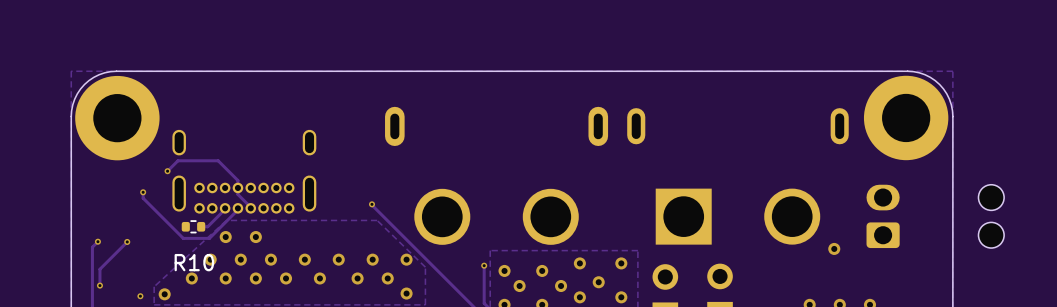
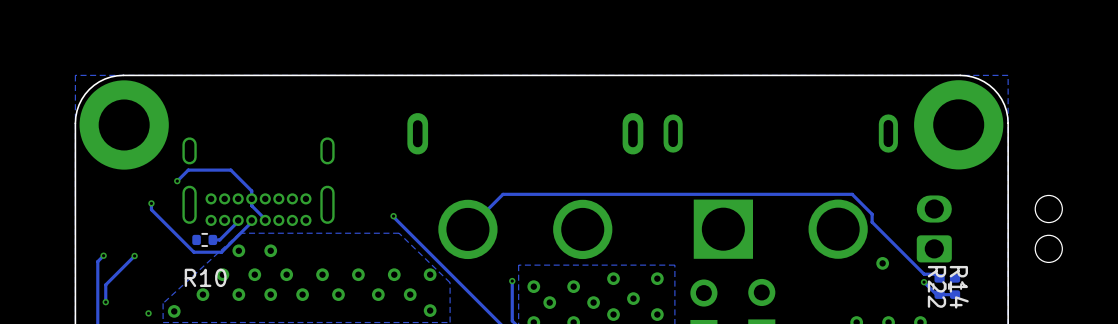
track: none -> (467, 229) (503, 194) (852, 194) (872, 214) (872, 222) (924, 274) (935, 274) (939, 278)
track: none -> (924, 282) (936, 294) (955, 294)
via: none -> (924, 282)
R14: none -> (939, 286)
R22: none -> (955, 286)

